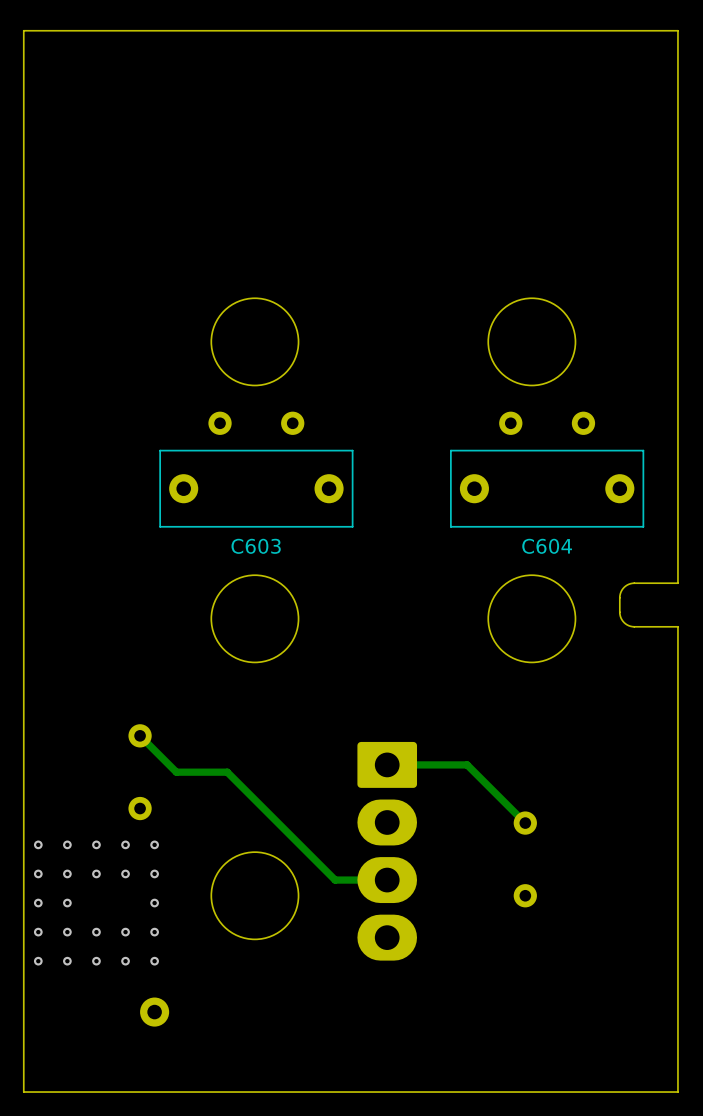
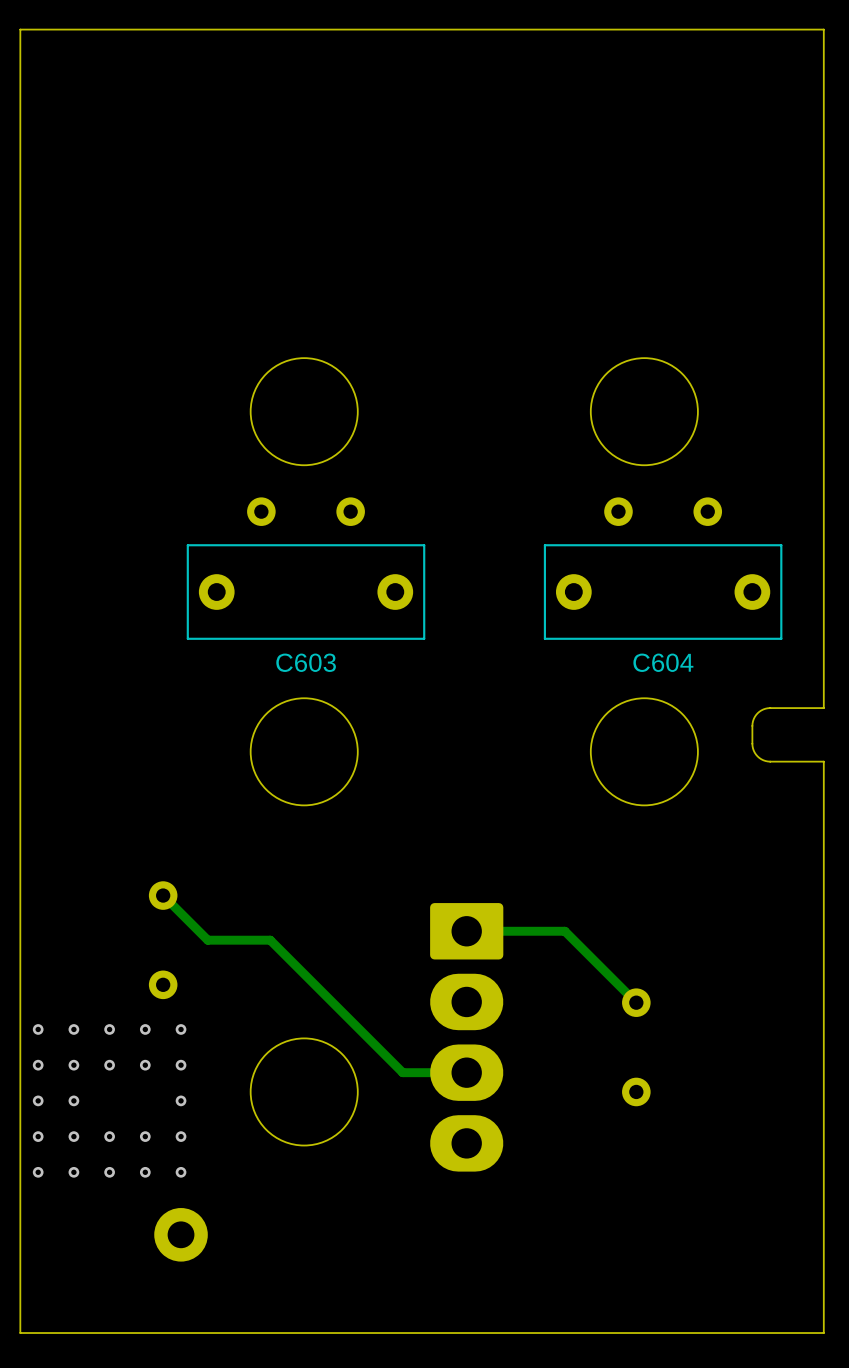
part footprint: [140, 997, 170, 1027] -> [154, 1208, 208, 1262]

